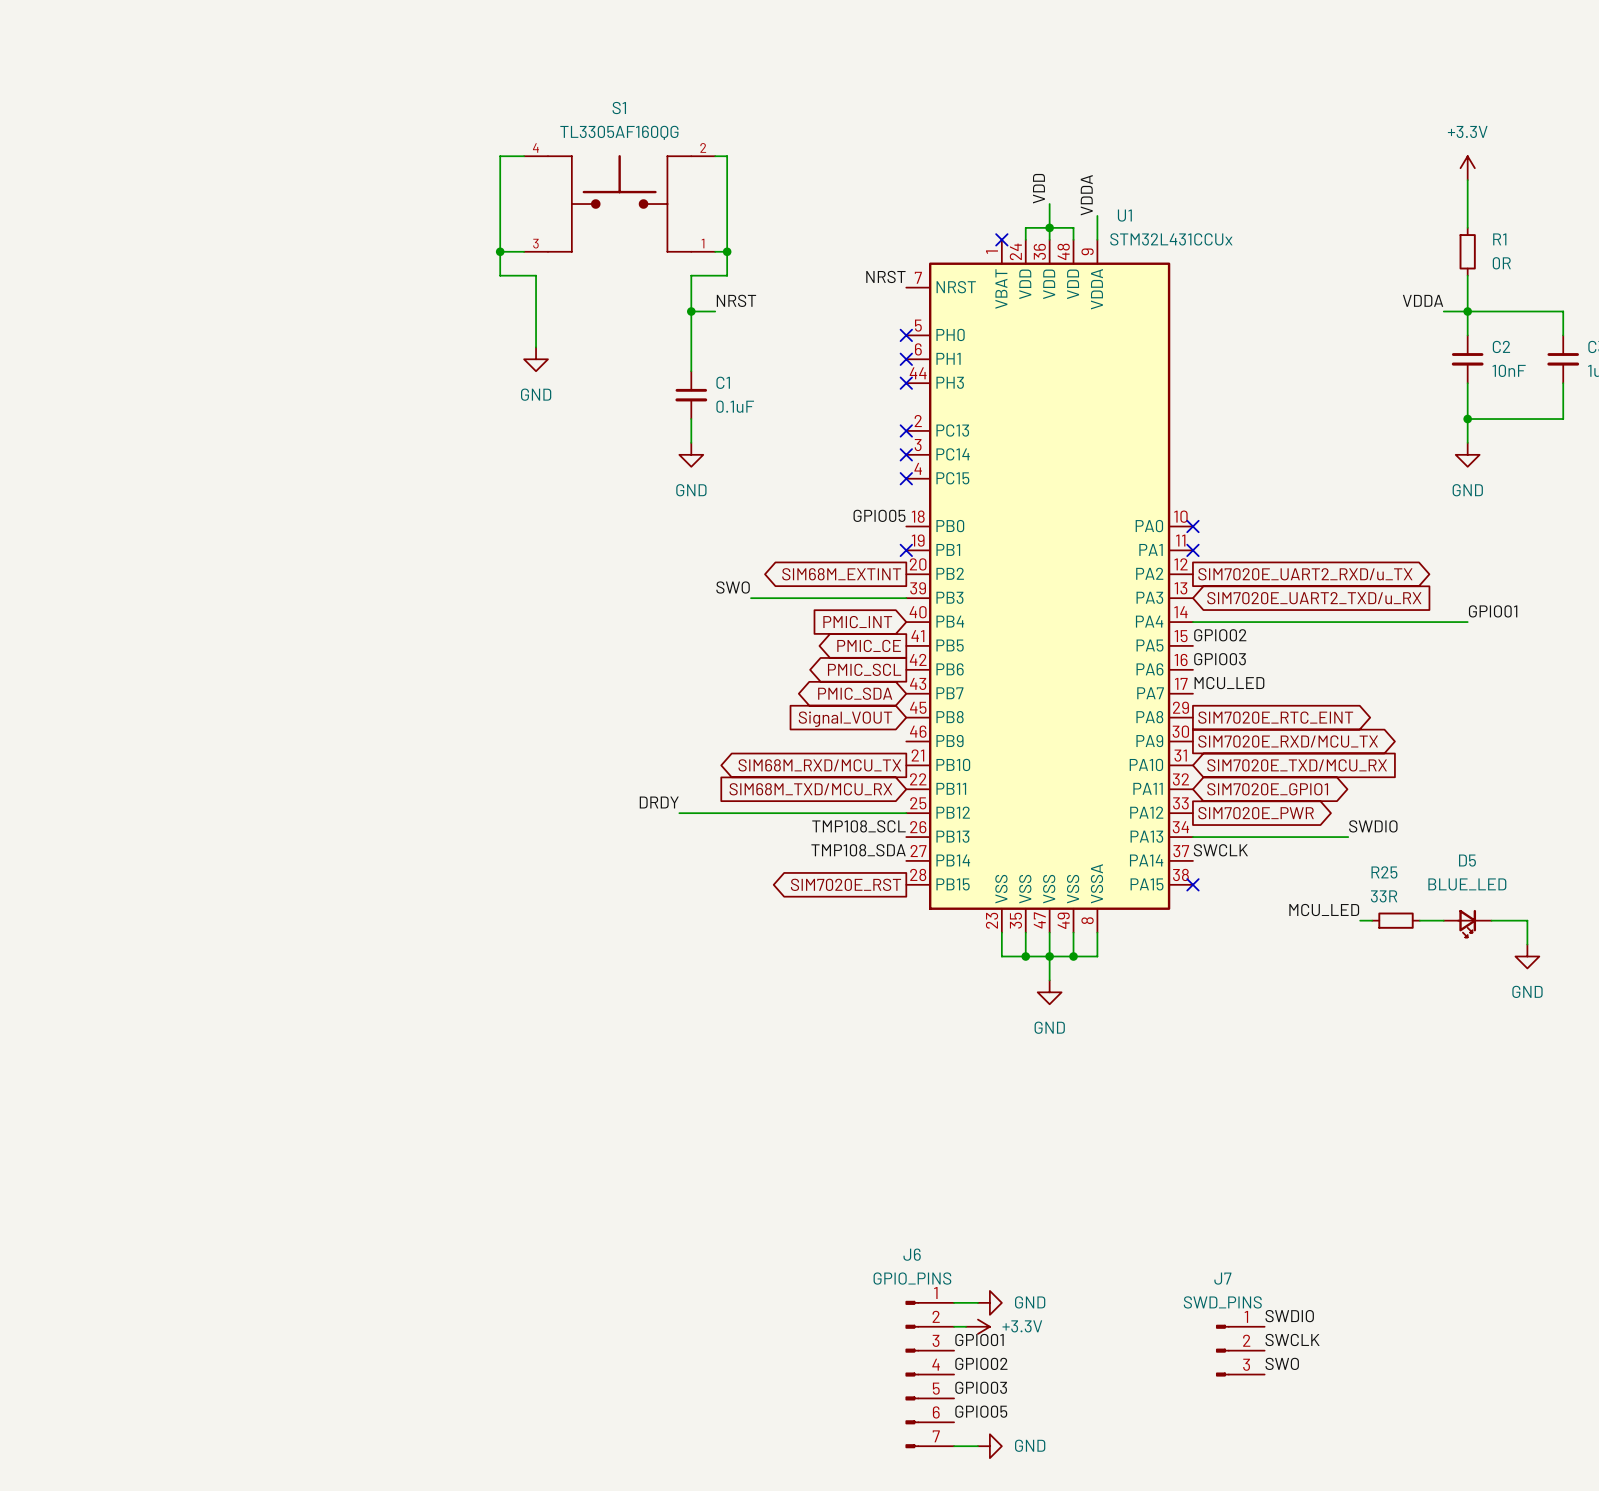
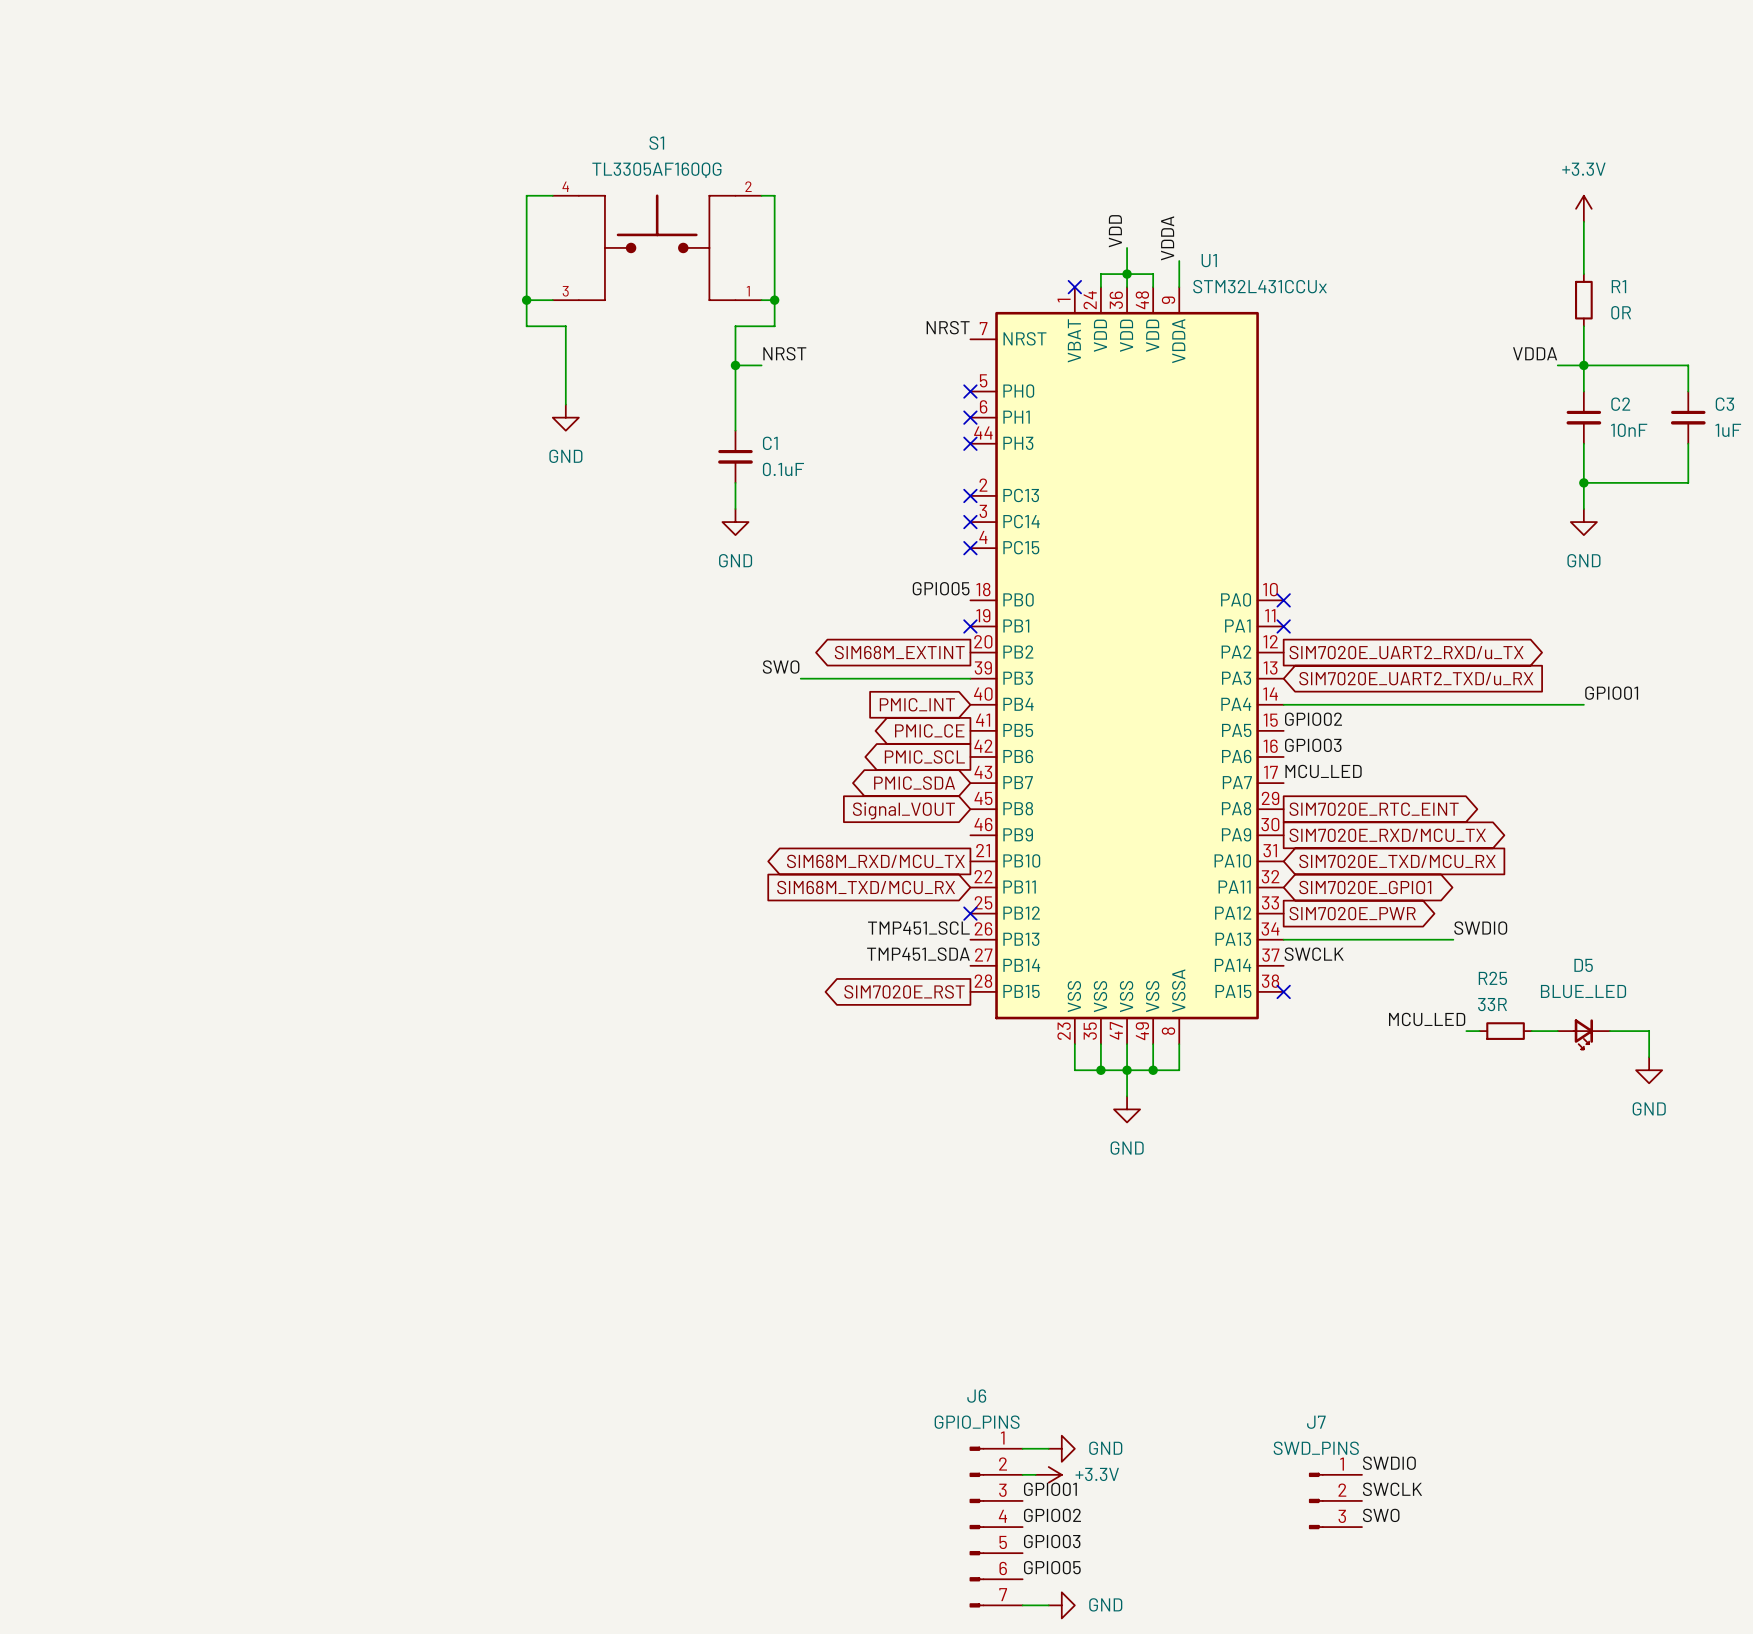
label: DRDY (659, 802) -> none
wire: (679, 813) (906, 813) -> none
no-connect mark: none -> (970, 913)
label: TMP108_SCL (858, 826) -> TMP451_SCL (918, 928)
label: TMP108_SDA (858, 850) -> TMP451_SDA (918, 954)

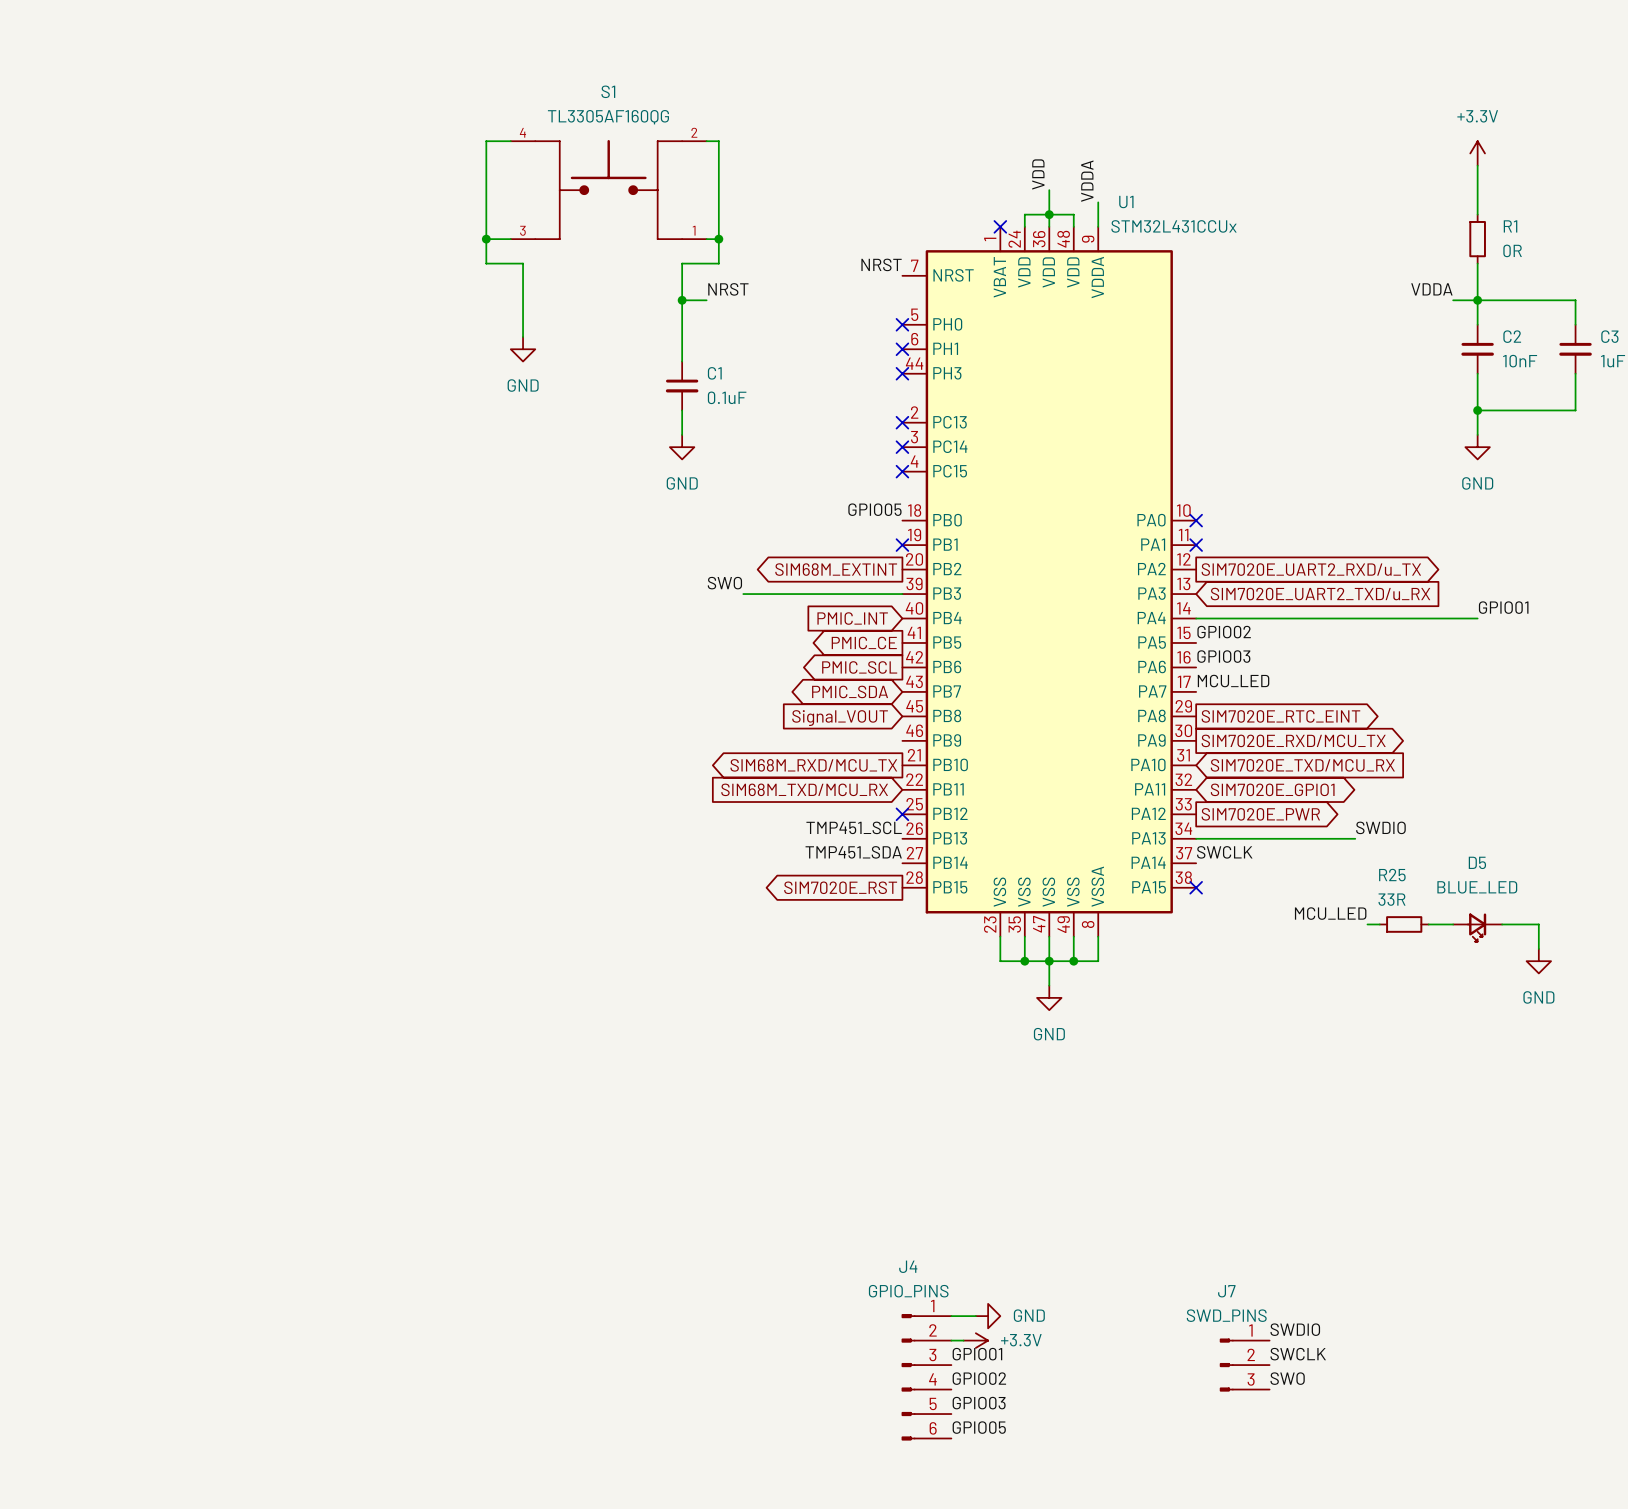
J4: none -> GPIO_PINS (926, 1377)
J6: GPIO_PINS (996, 1527) -> none
wire: (1022, 1605) (1048, 1605) -> none
power symbol: GND (1061, 1605) -> none

